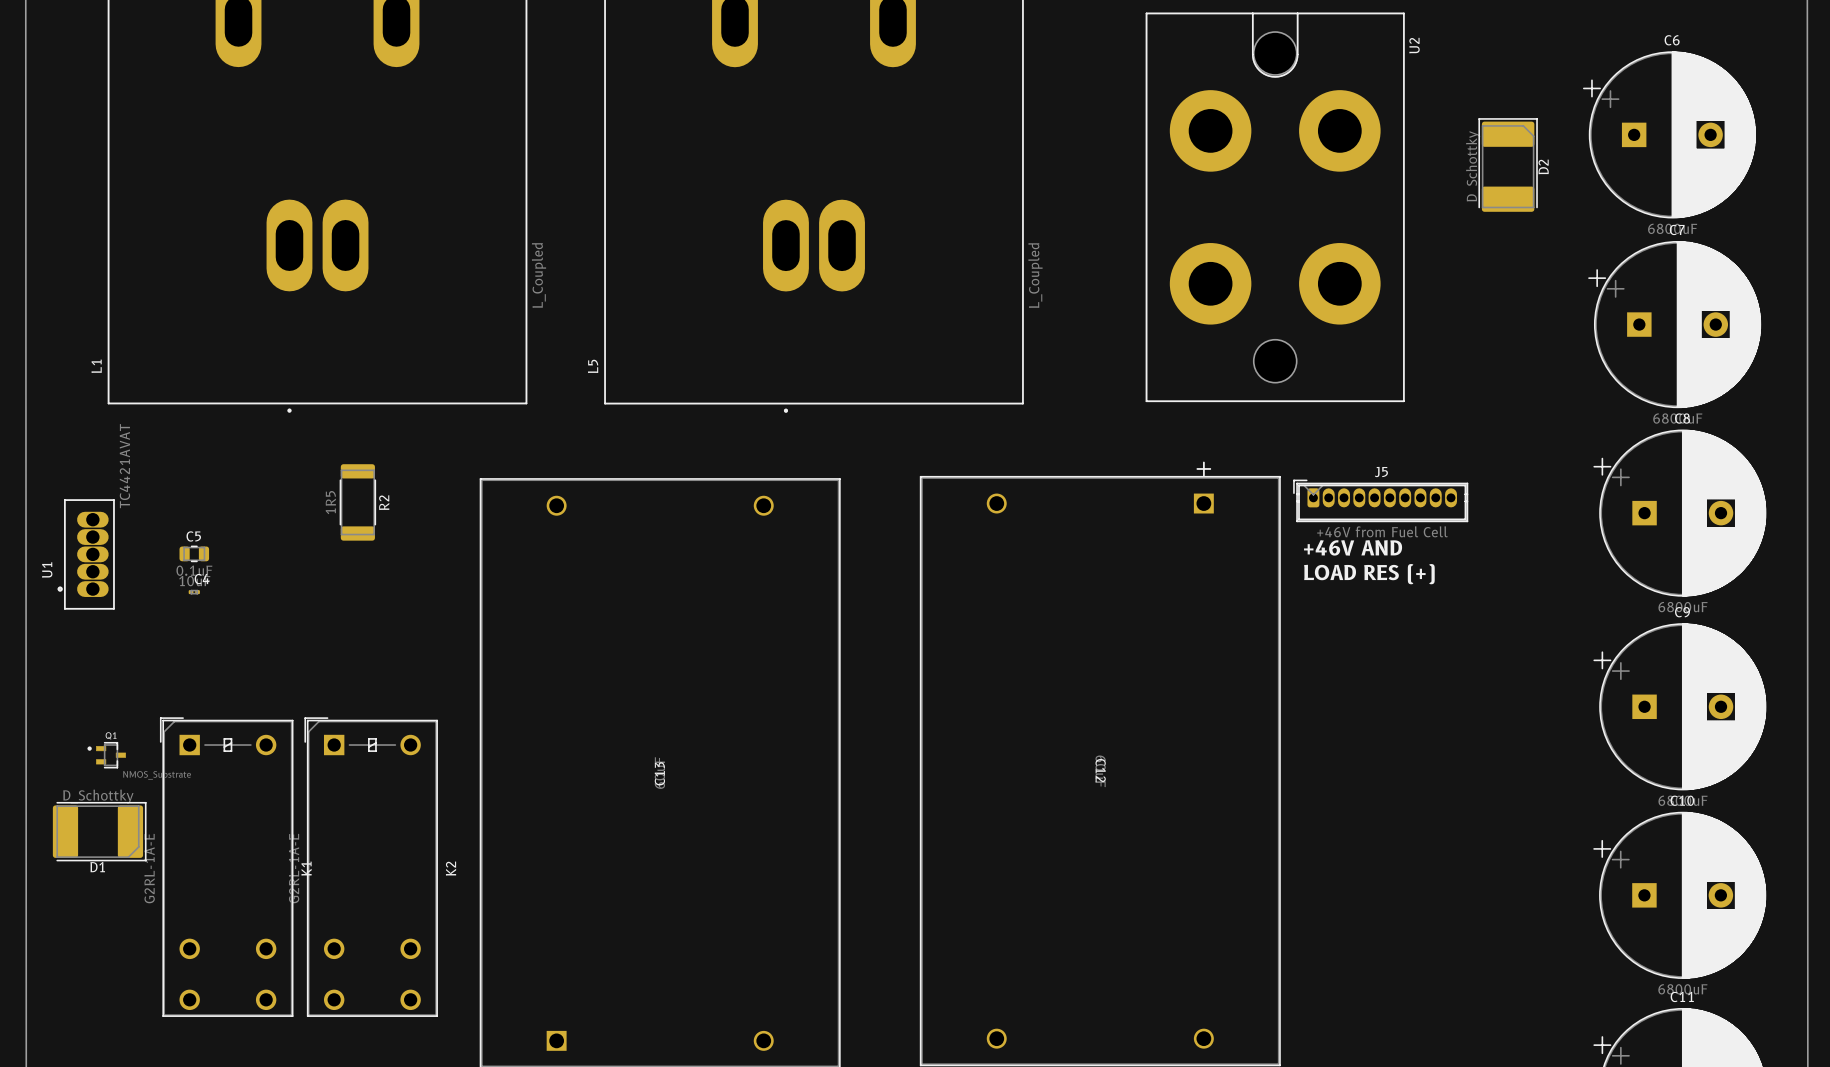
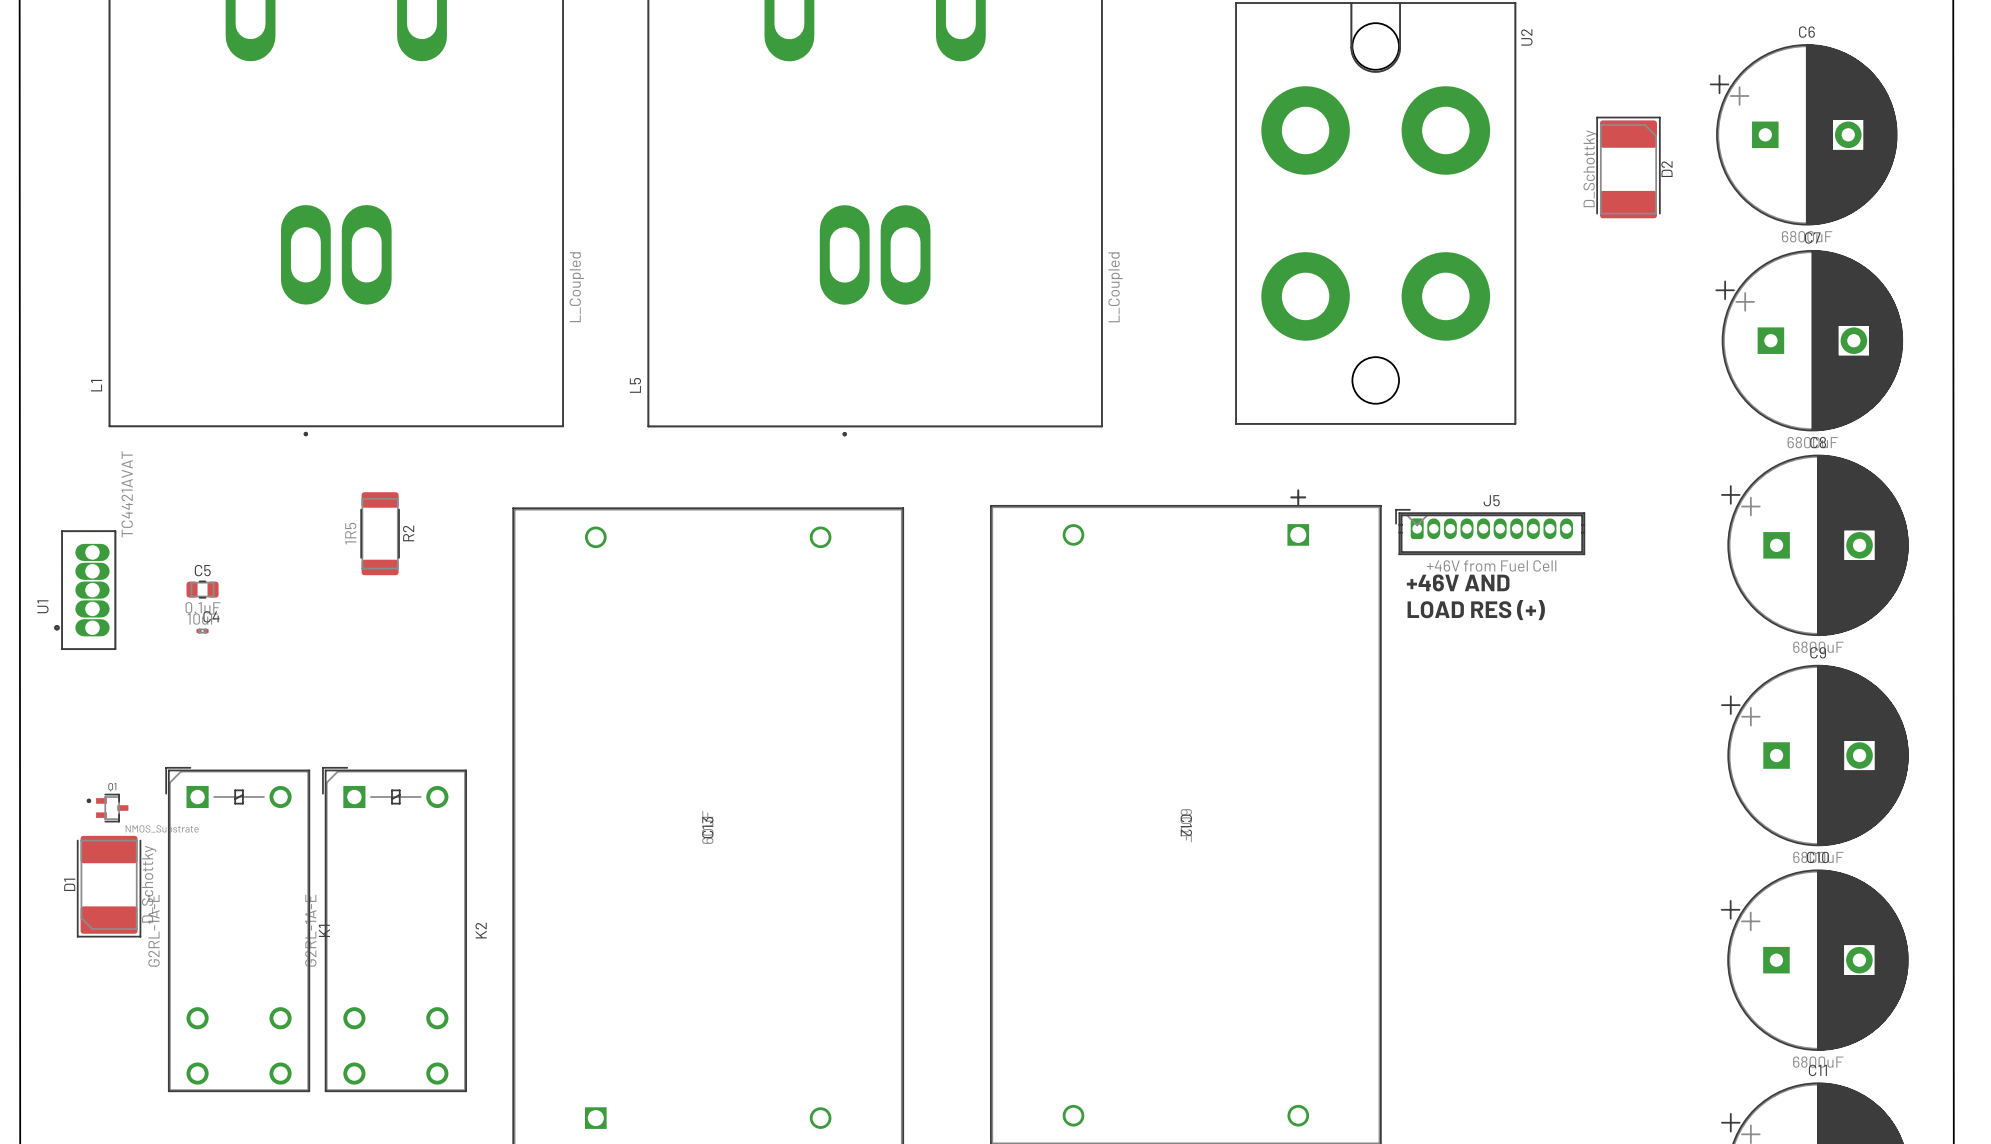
D1 rotation: 0° (99, 831) -> 90° clockwise (109, 886)

